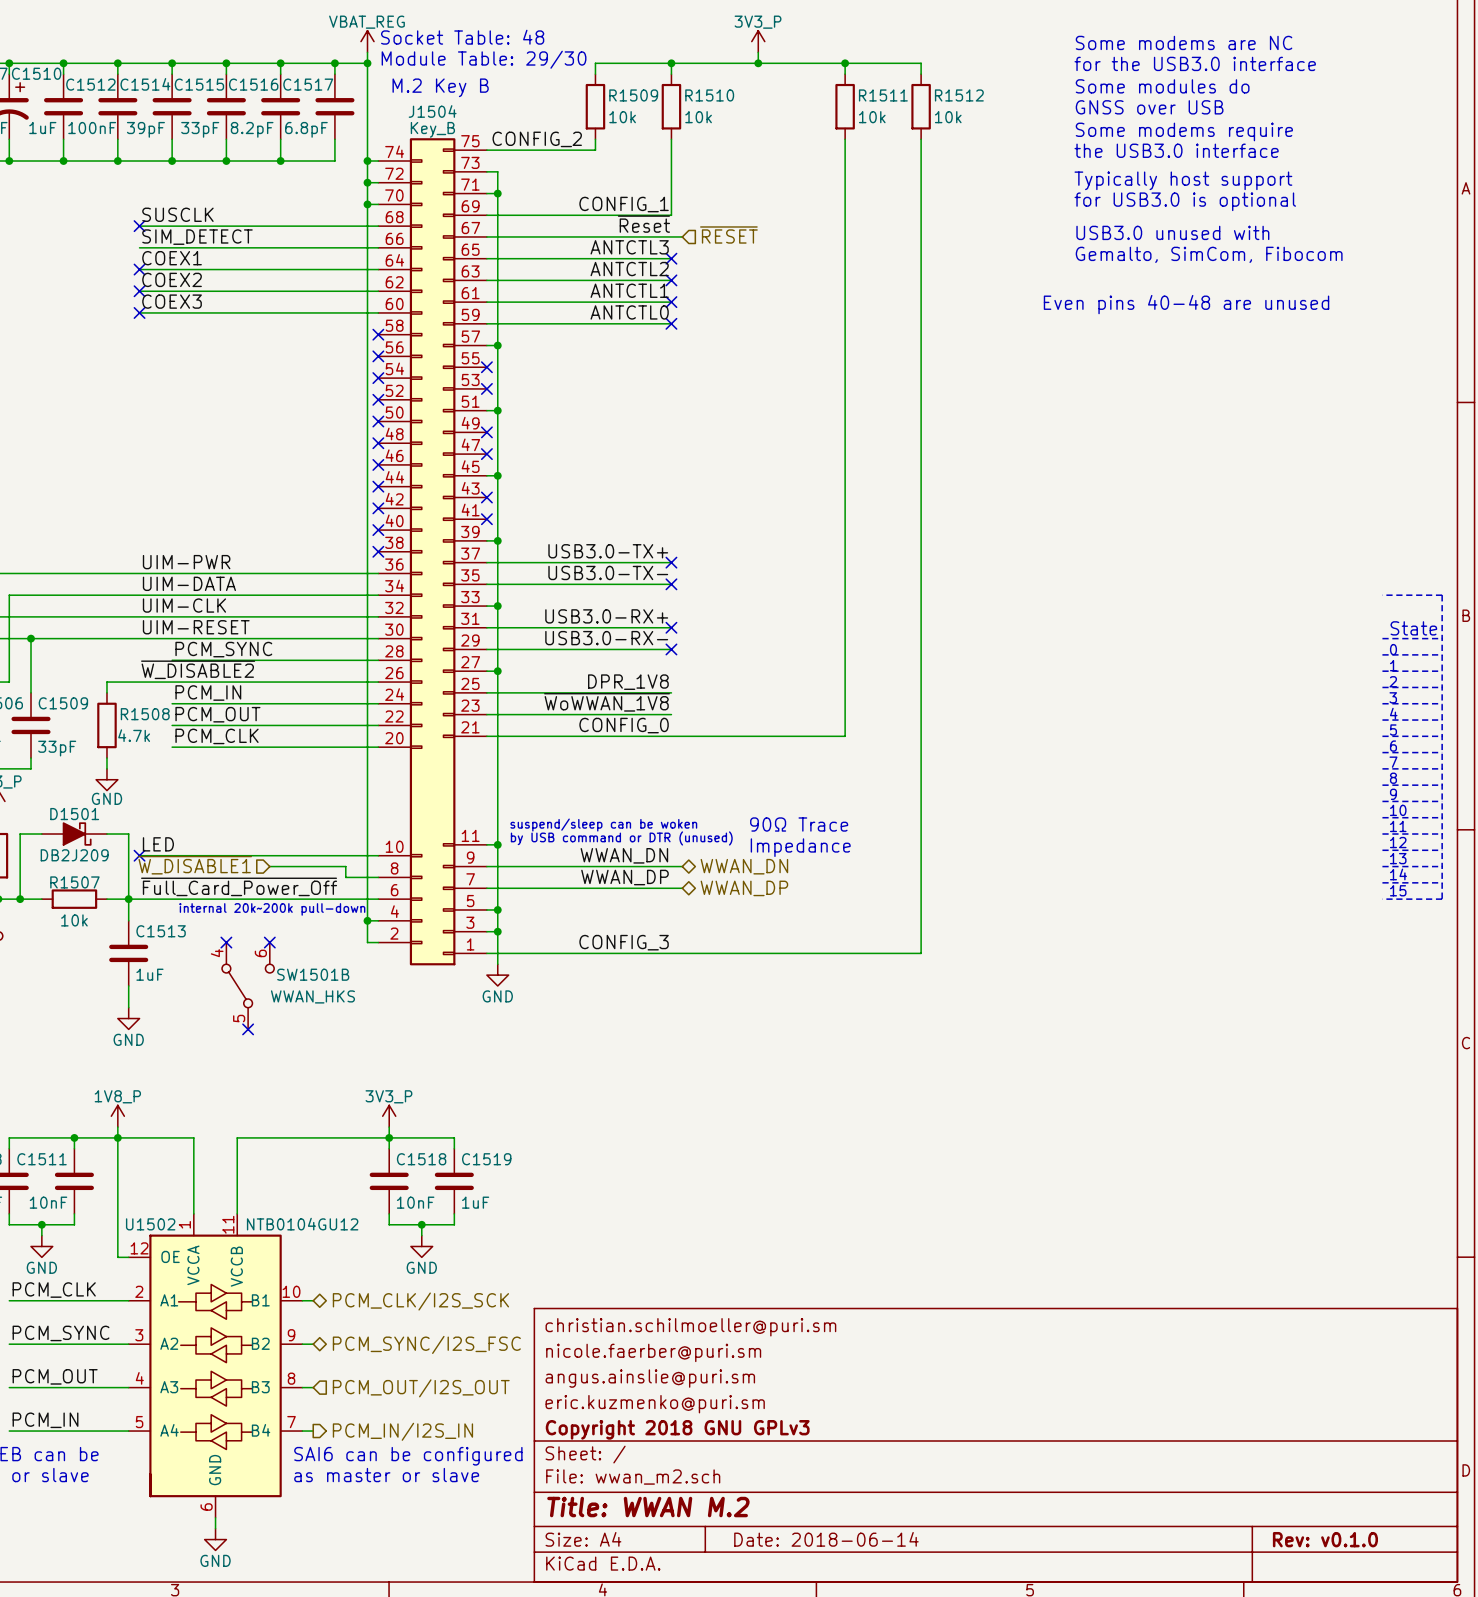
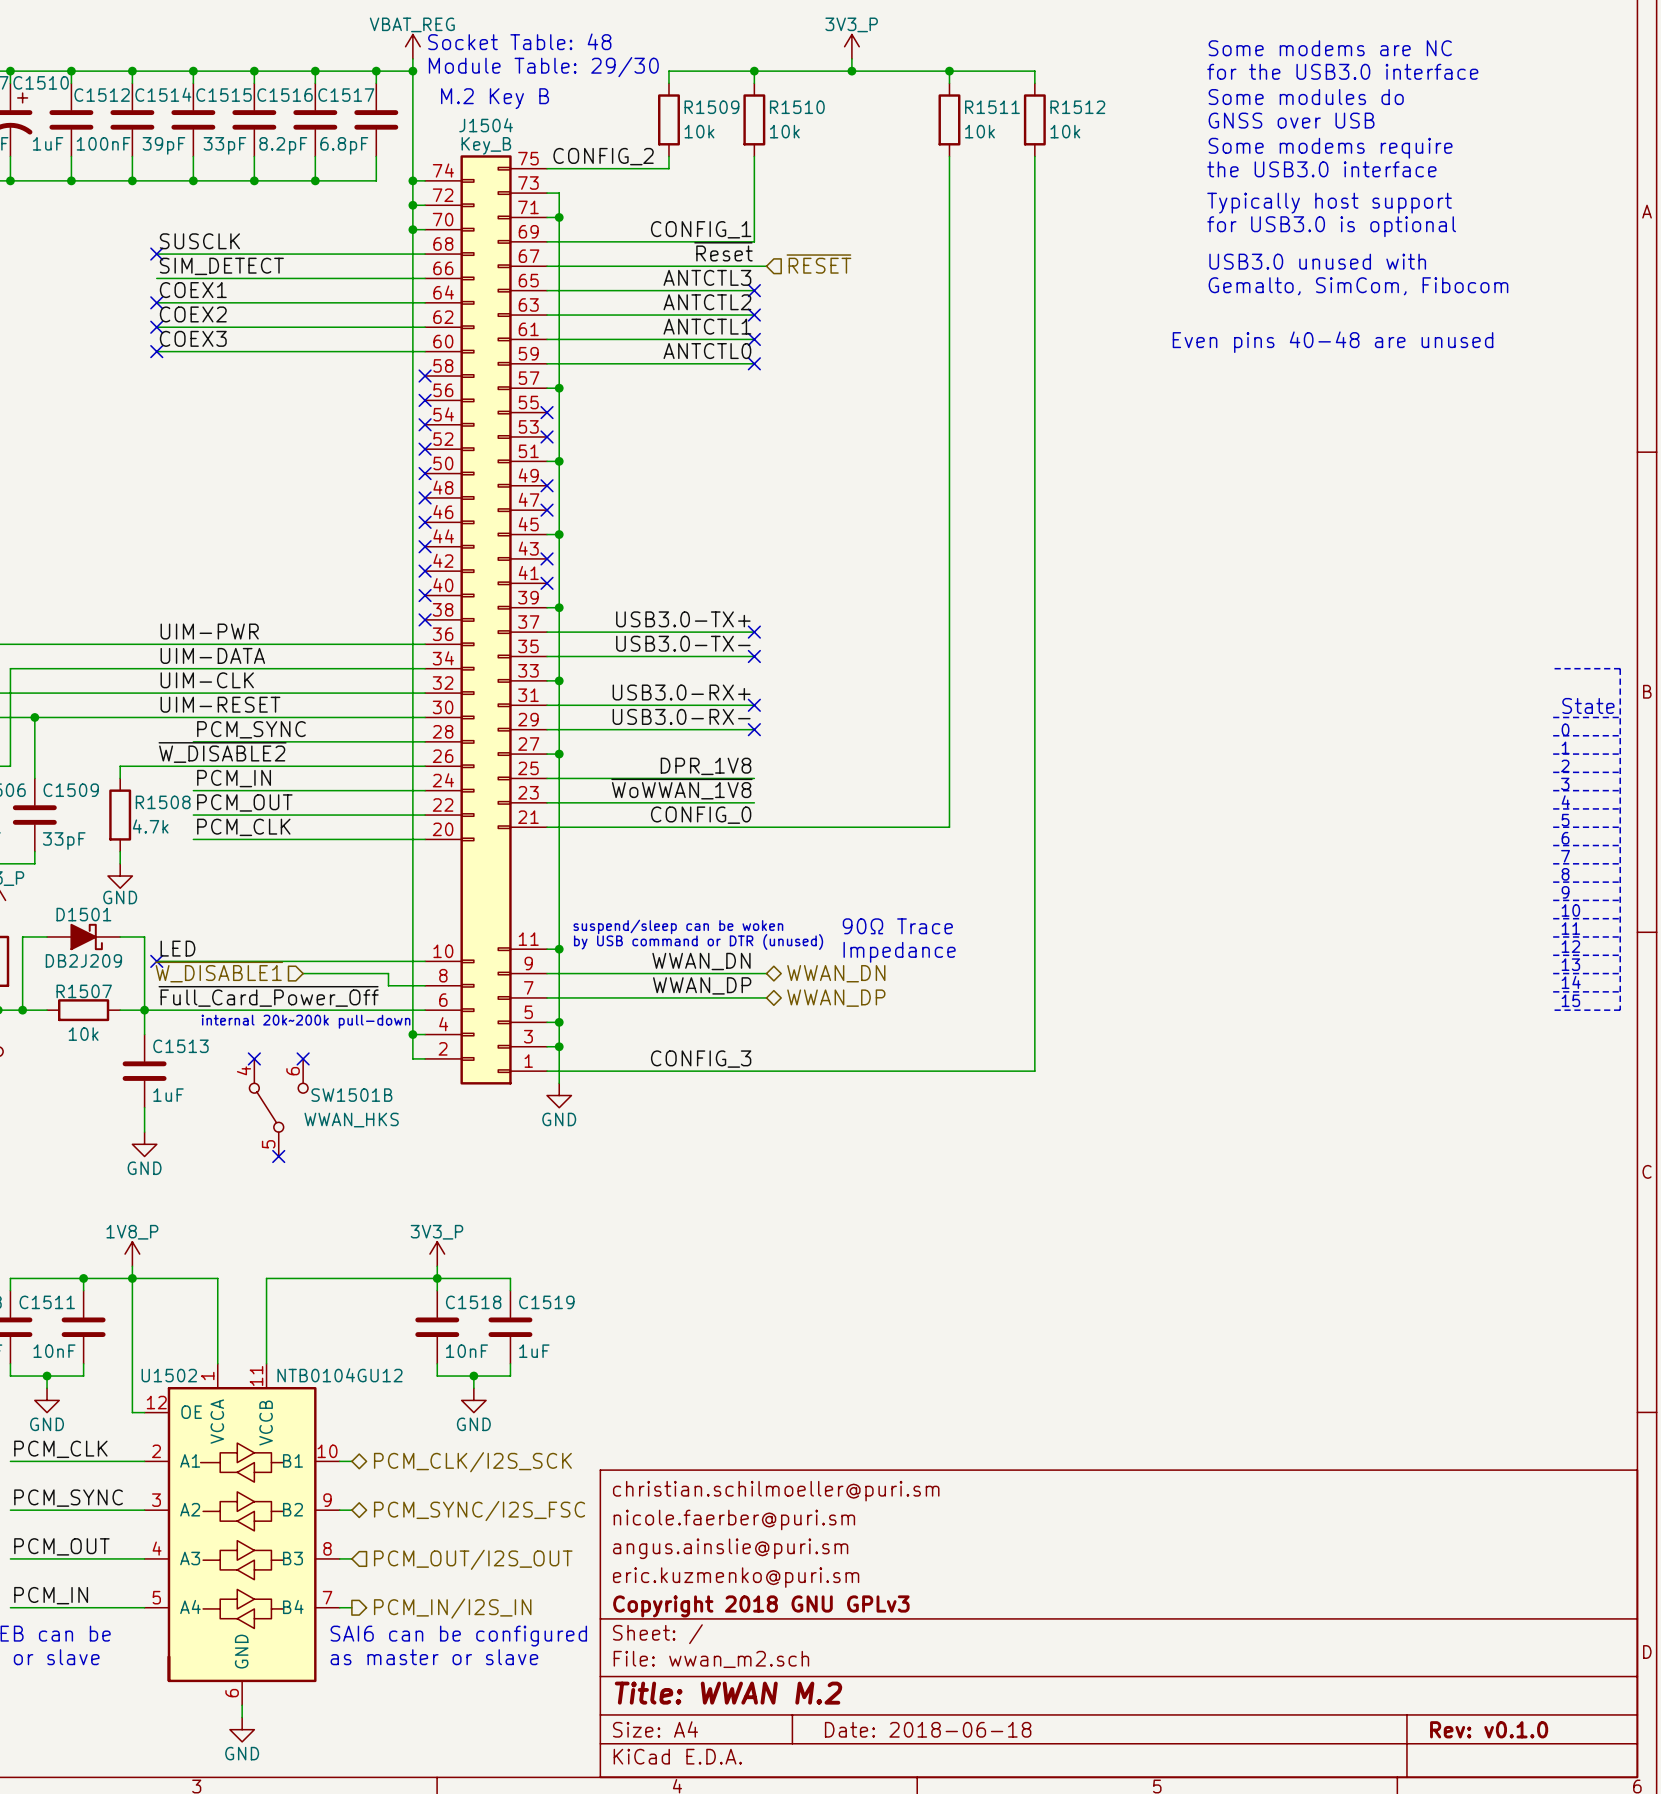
title block: Date: 2018-06-14 (826, 1539) -> Date: 2018-06-18 (928, 1729)

